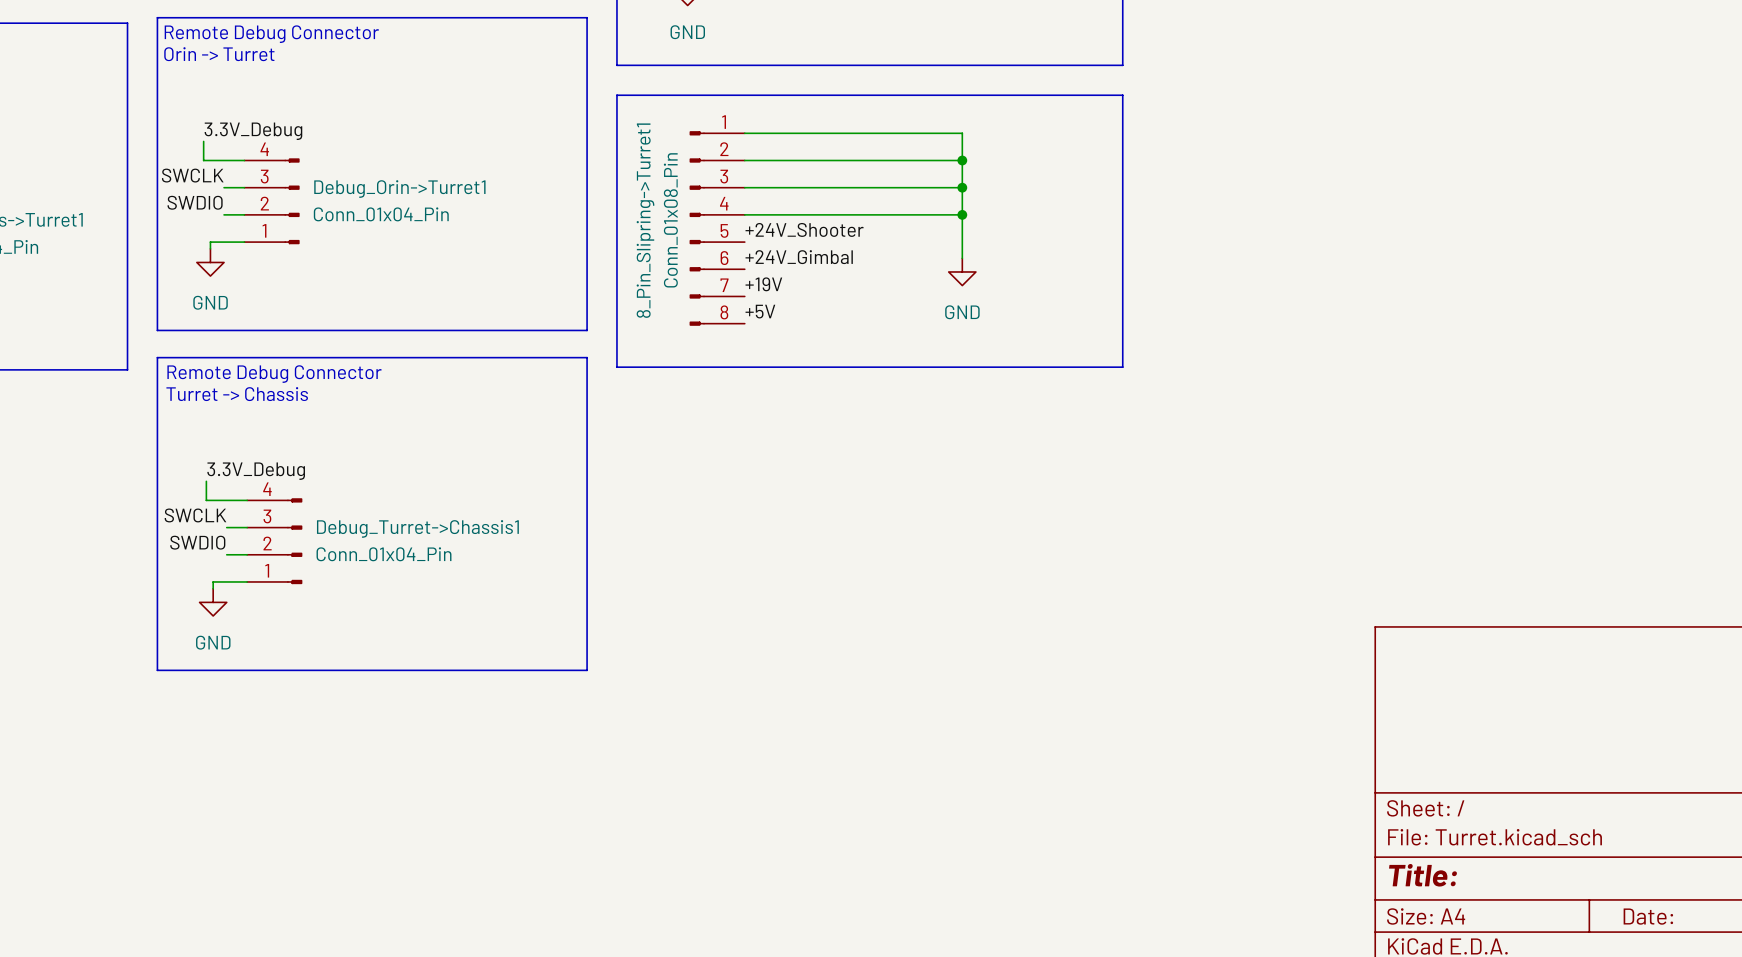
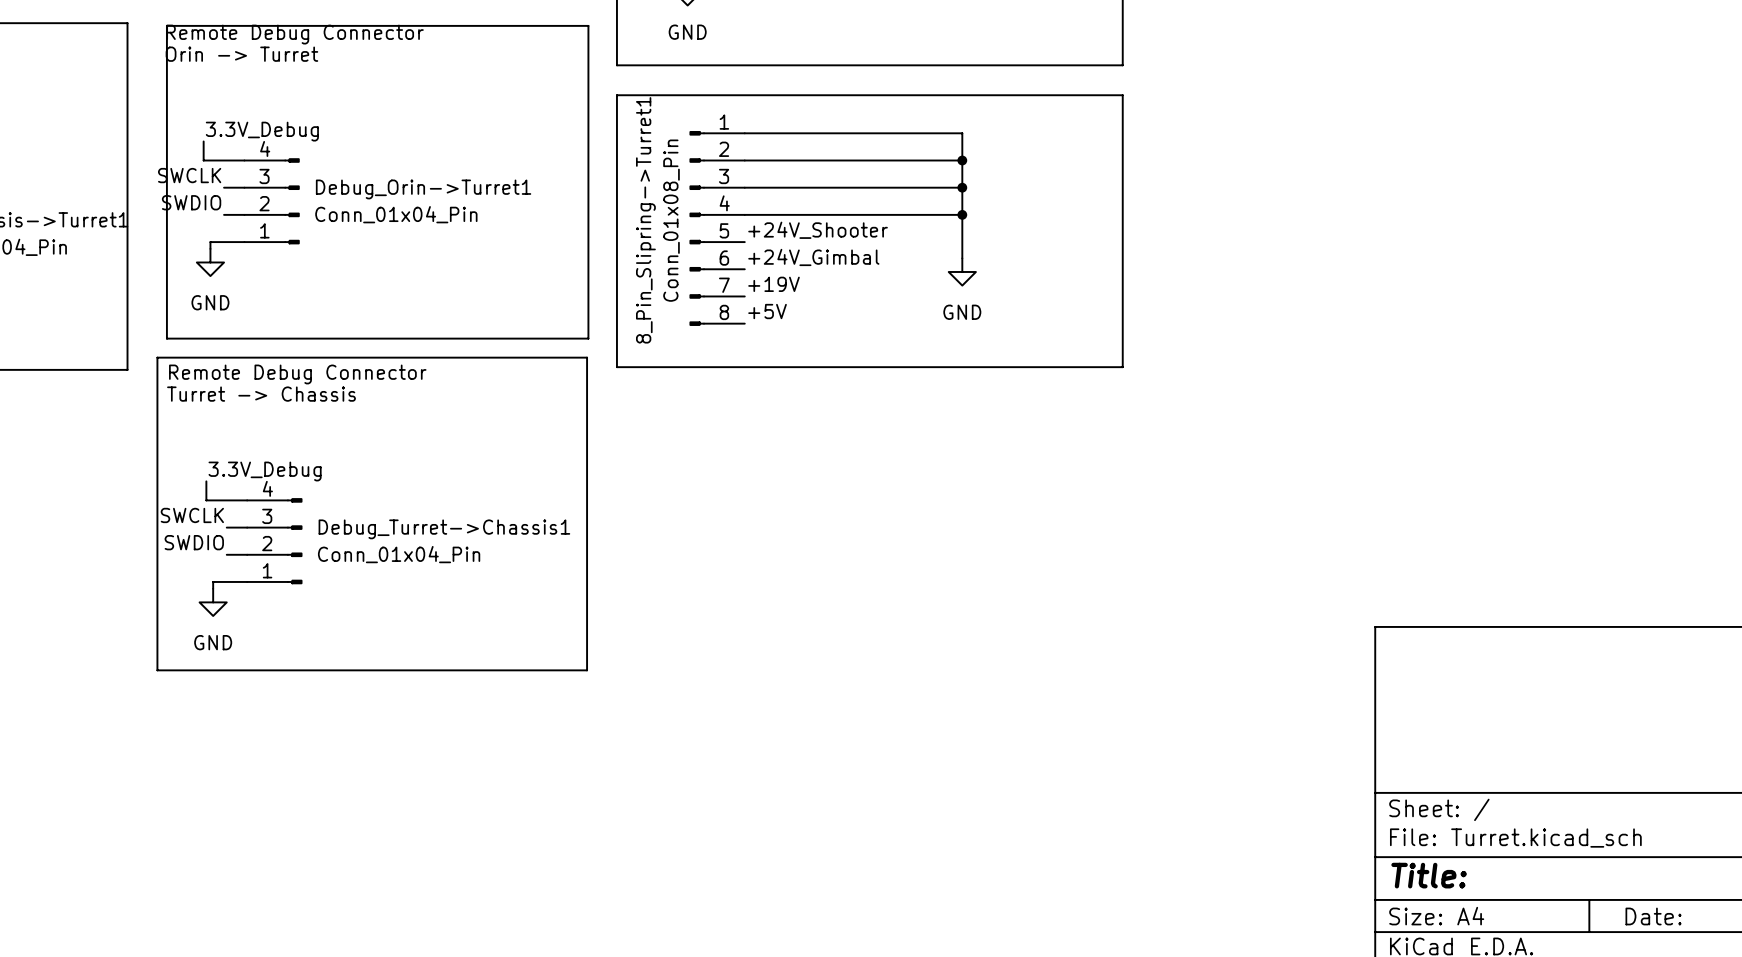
line: (157, 17) (587, 17) (587, 330) (157, 330) (157, 17) -> (166, 25) (166, 338) (588, 338) (588, 25) (166, 25)

